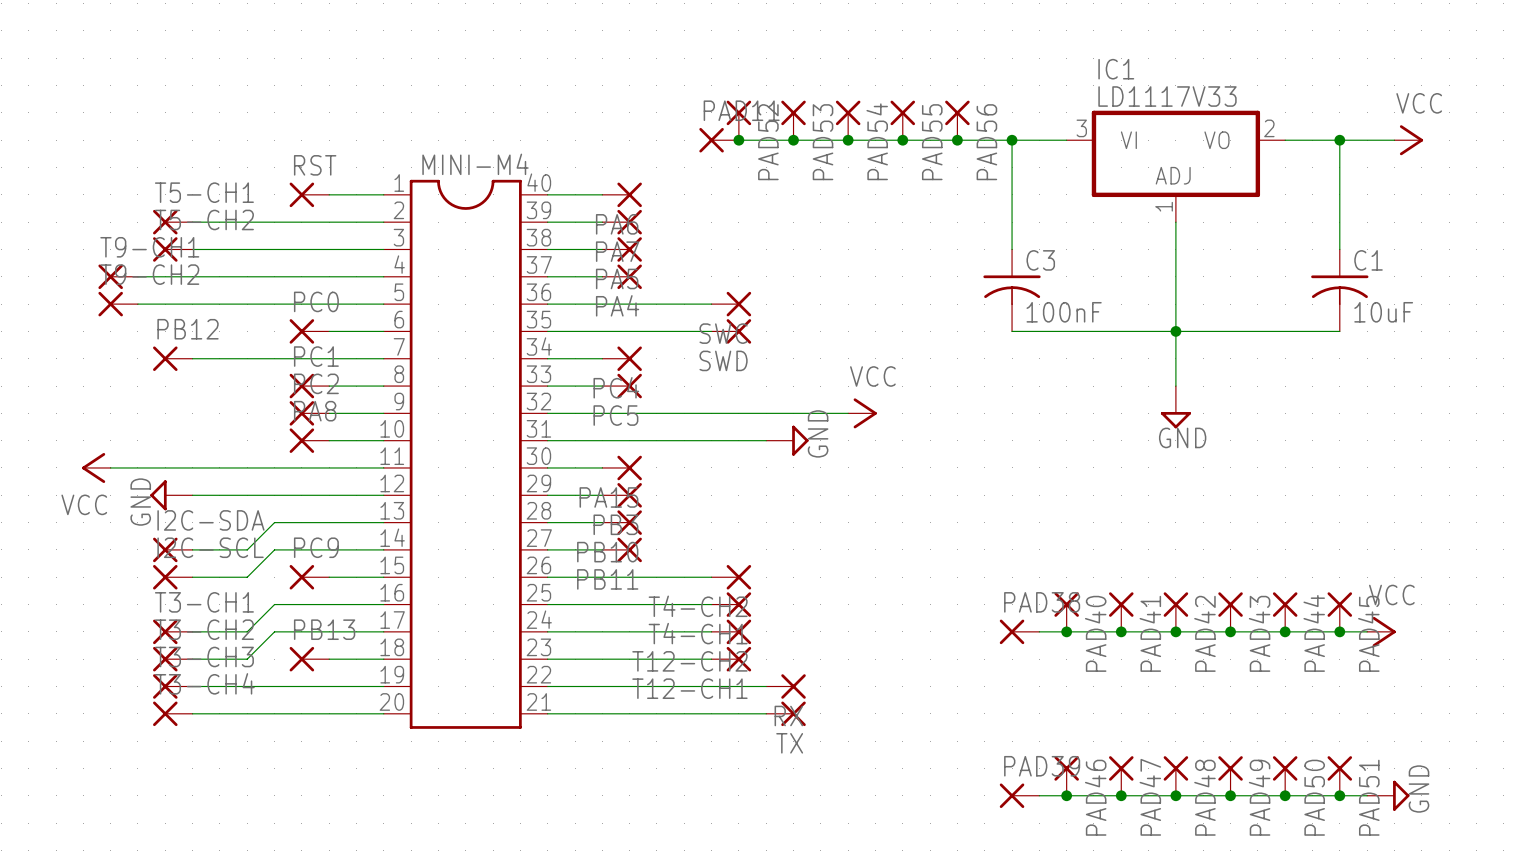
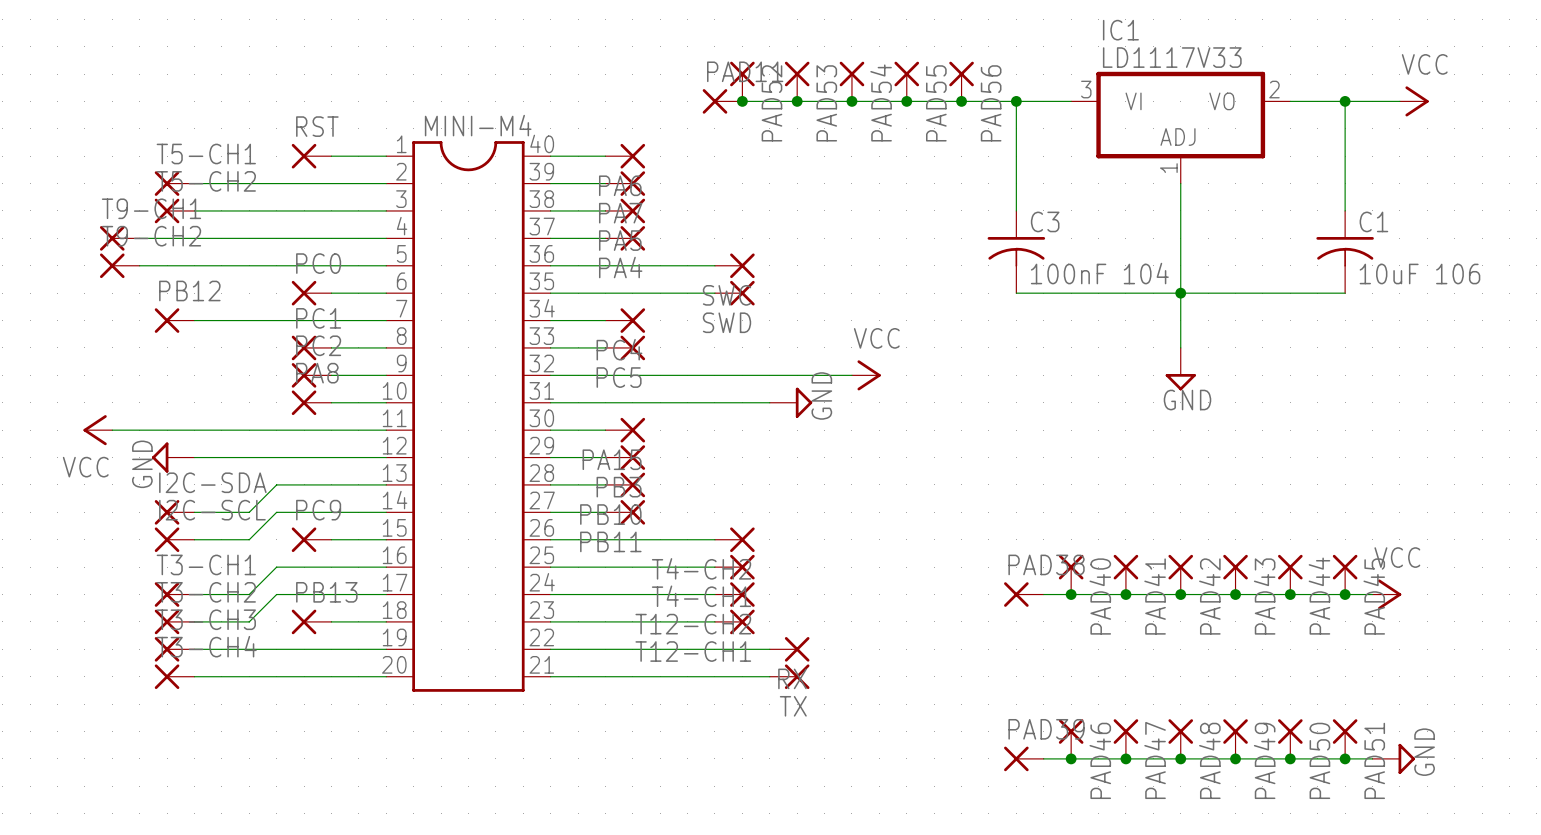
C3 value: 100nF (1064, 312) -> 100nF 104 (1099, 273)
C1 value: 10uF (1383, 312) -> 10uF 106 (1419, 273)

